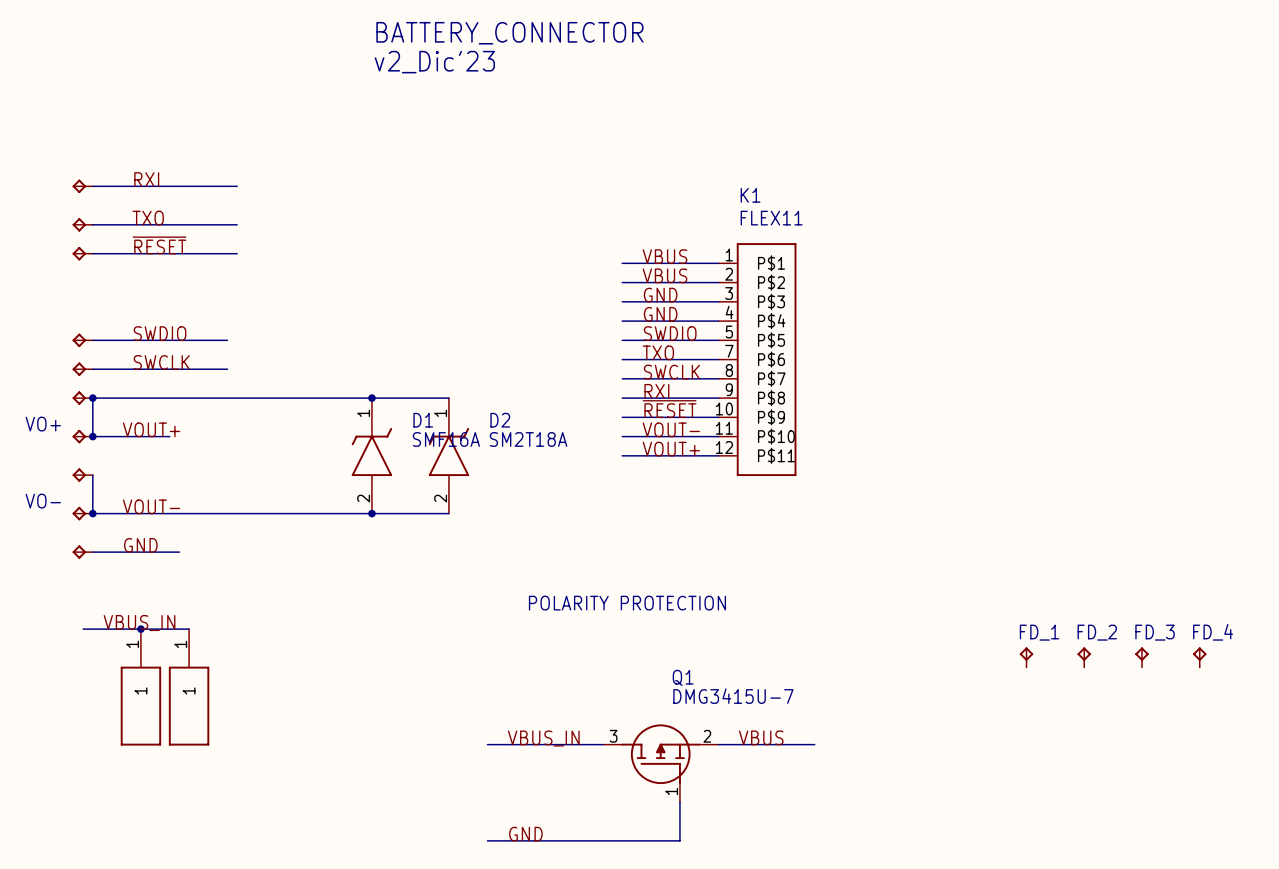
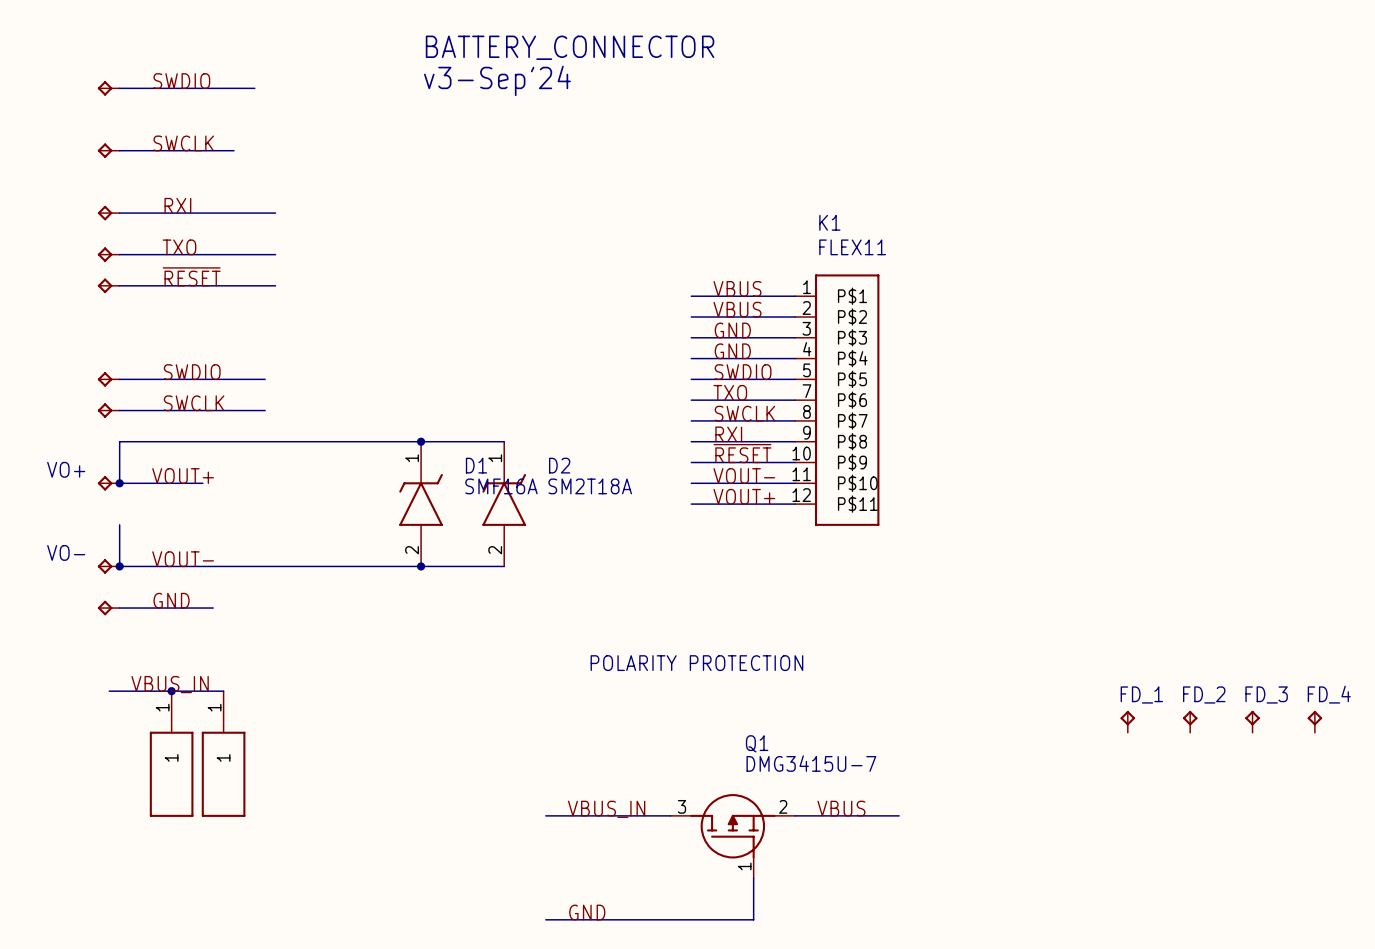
text: v2_Dic'23 (434, 62) -> v3-Sep'24 (497, 80)
label: none -> SWDIO (181, 81)
part: none -> (108, 88)
wire: none -> (119, 88) (254, 88)
label: none -> SWCLK (183, 143)
part: none -> (108, 150)
wire: none -> (119, 150) (233, 150)
part: (82, 398) -> none
junction: (92, 398) -> none
part: (82, 475) -> none

